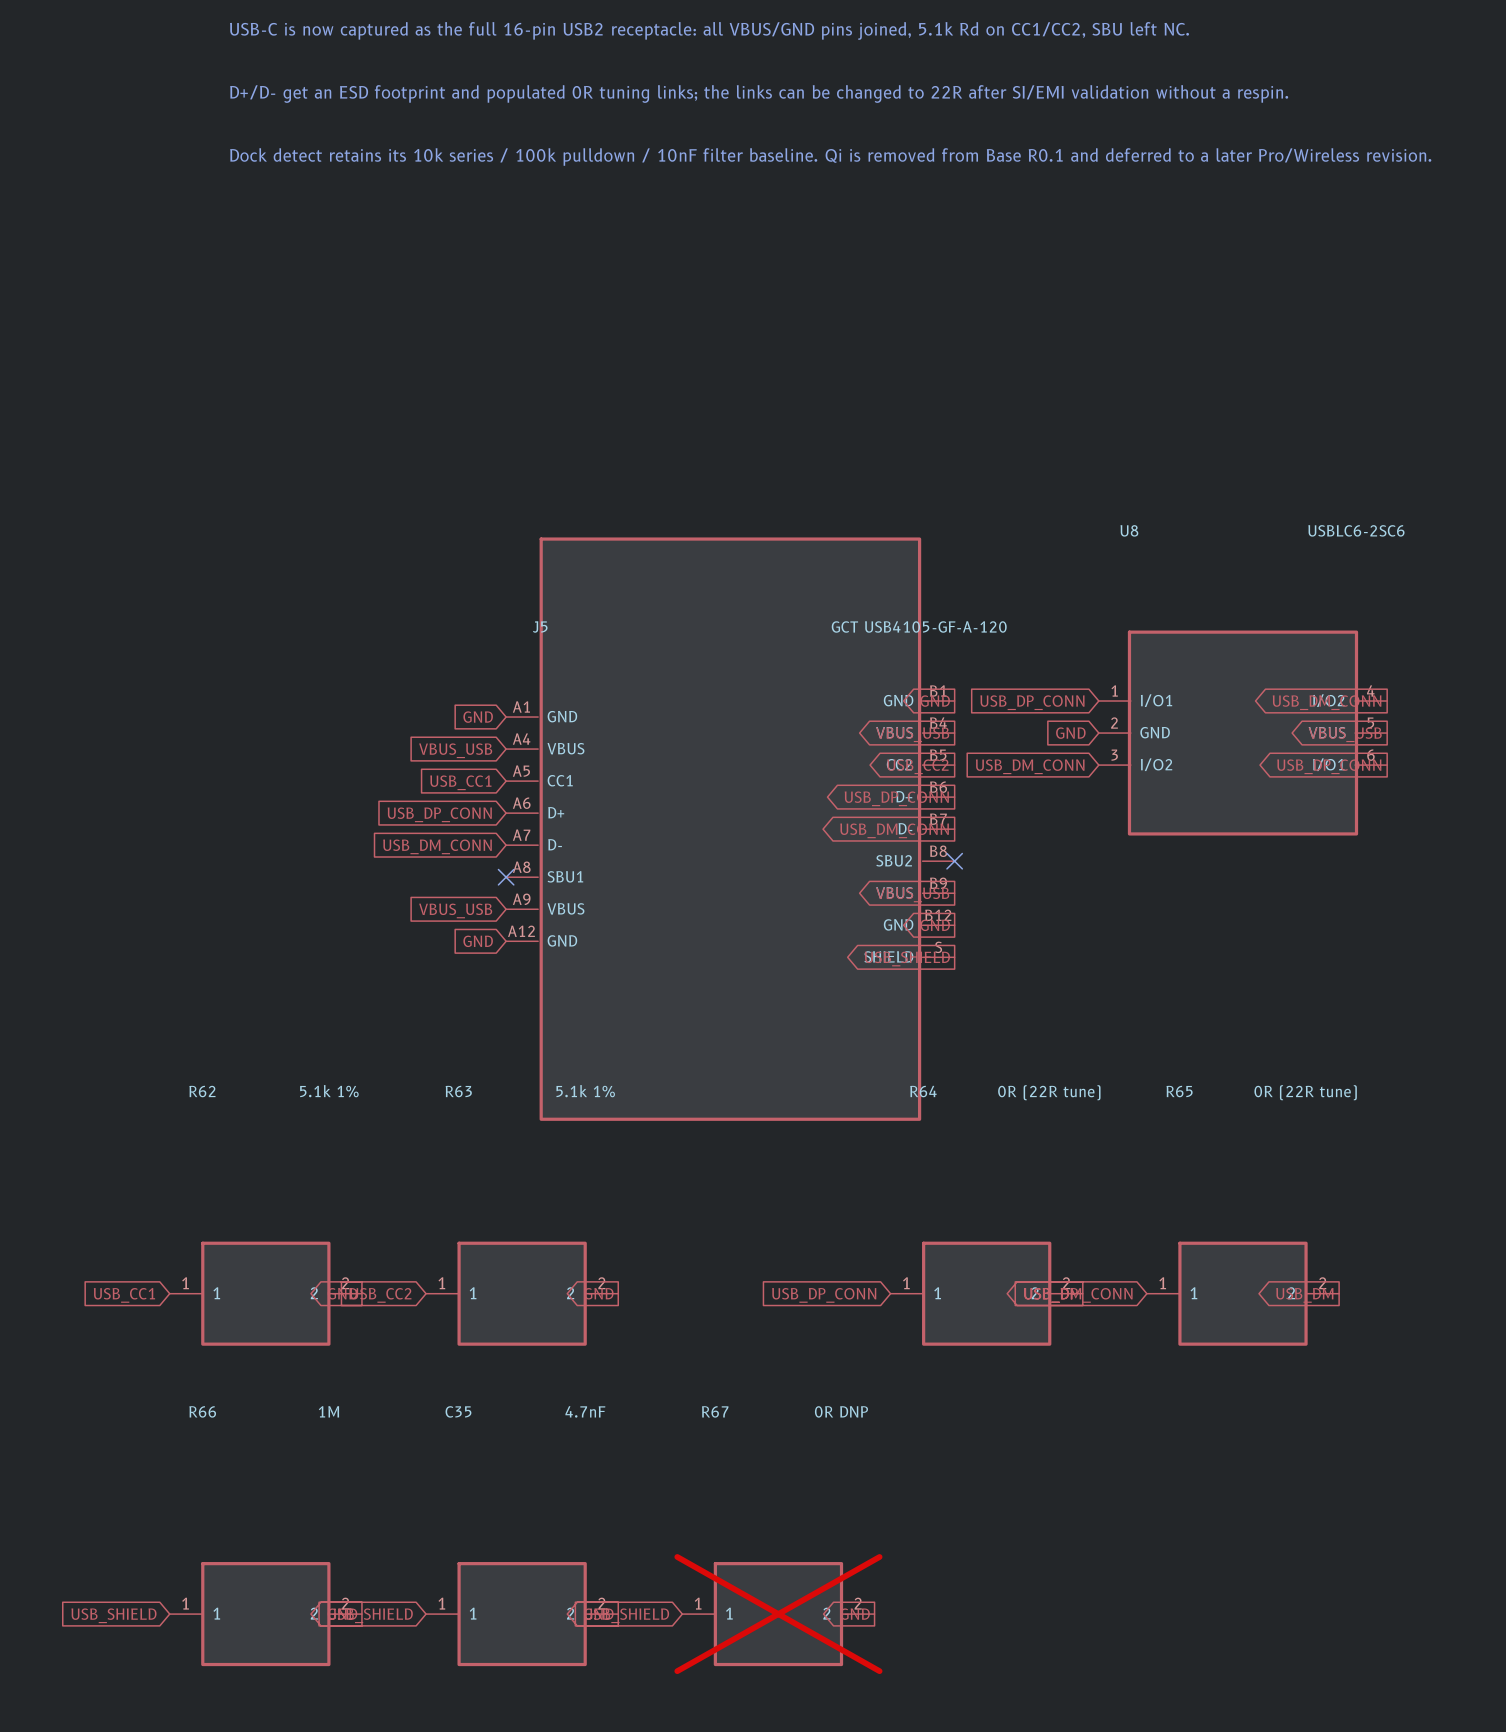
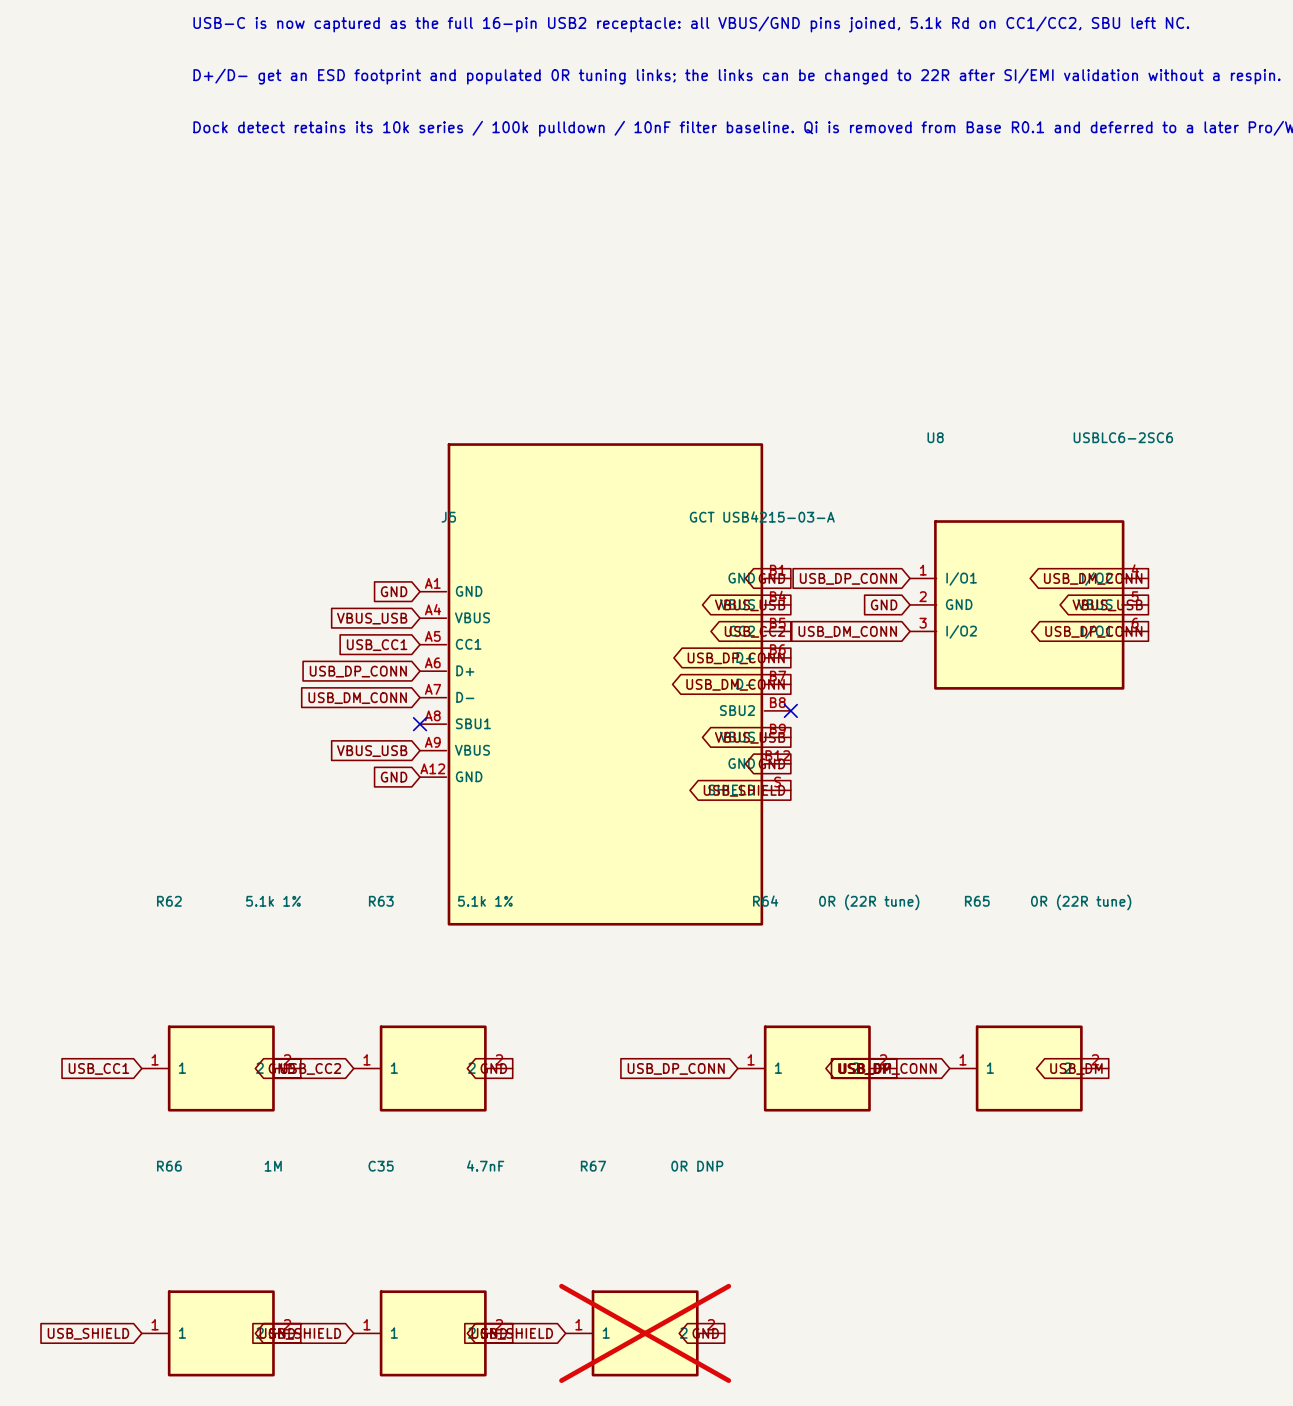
J5 value: GCT USB4105-GF-A-120 (919, 626) -> GCT USB4215-03-A (762, 516)

